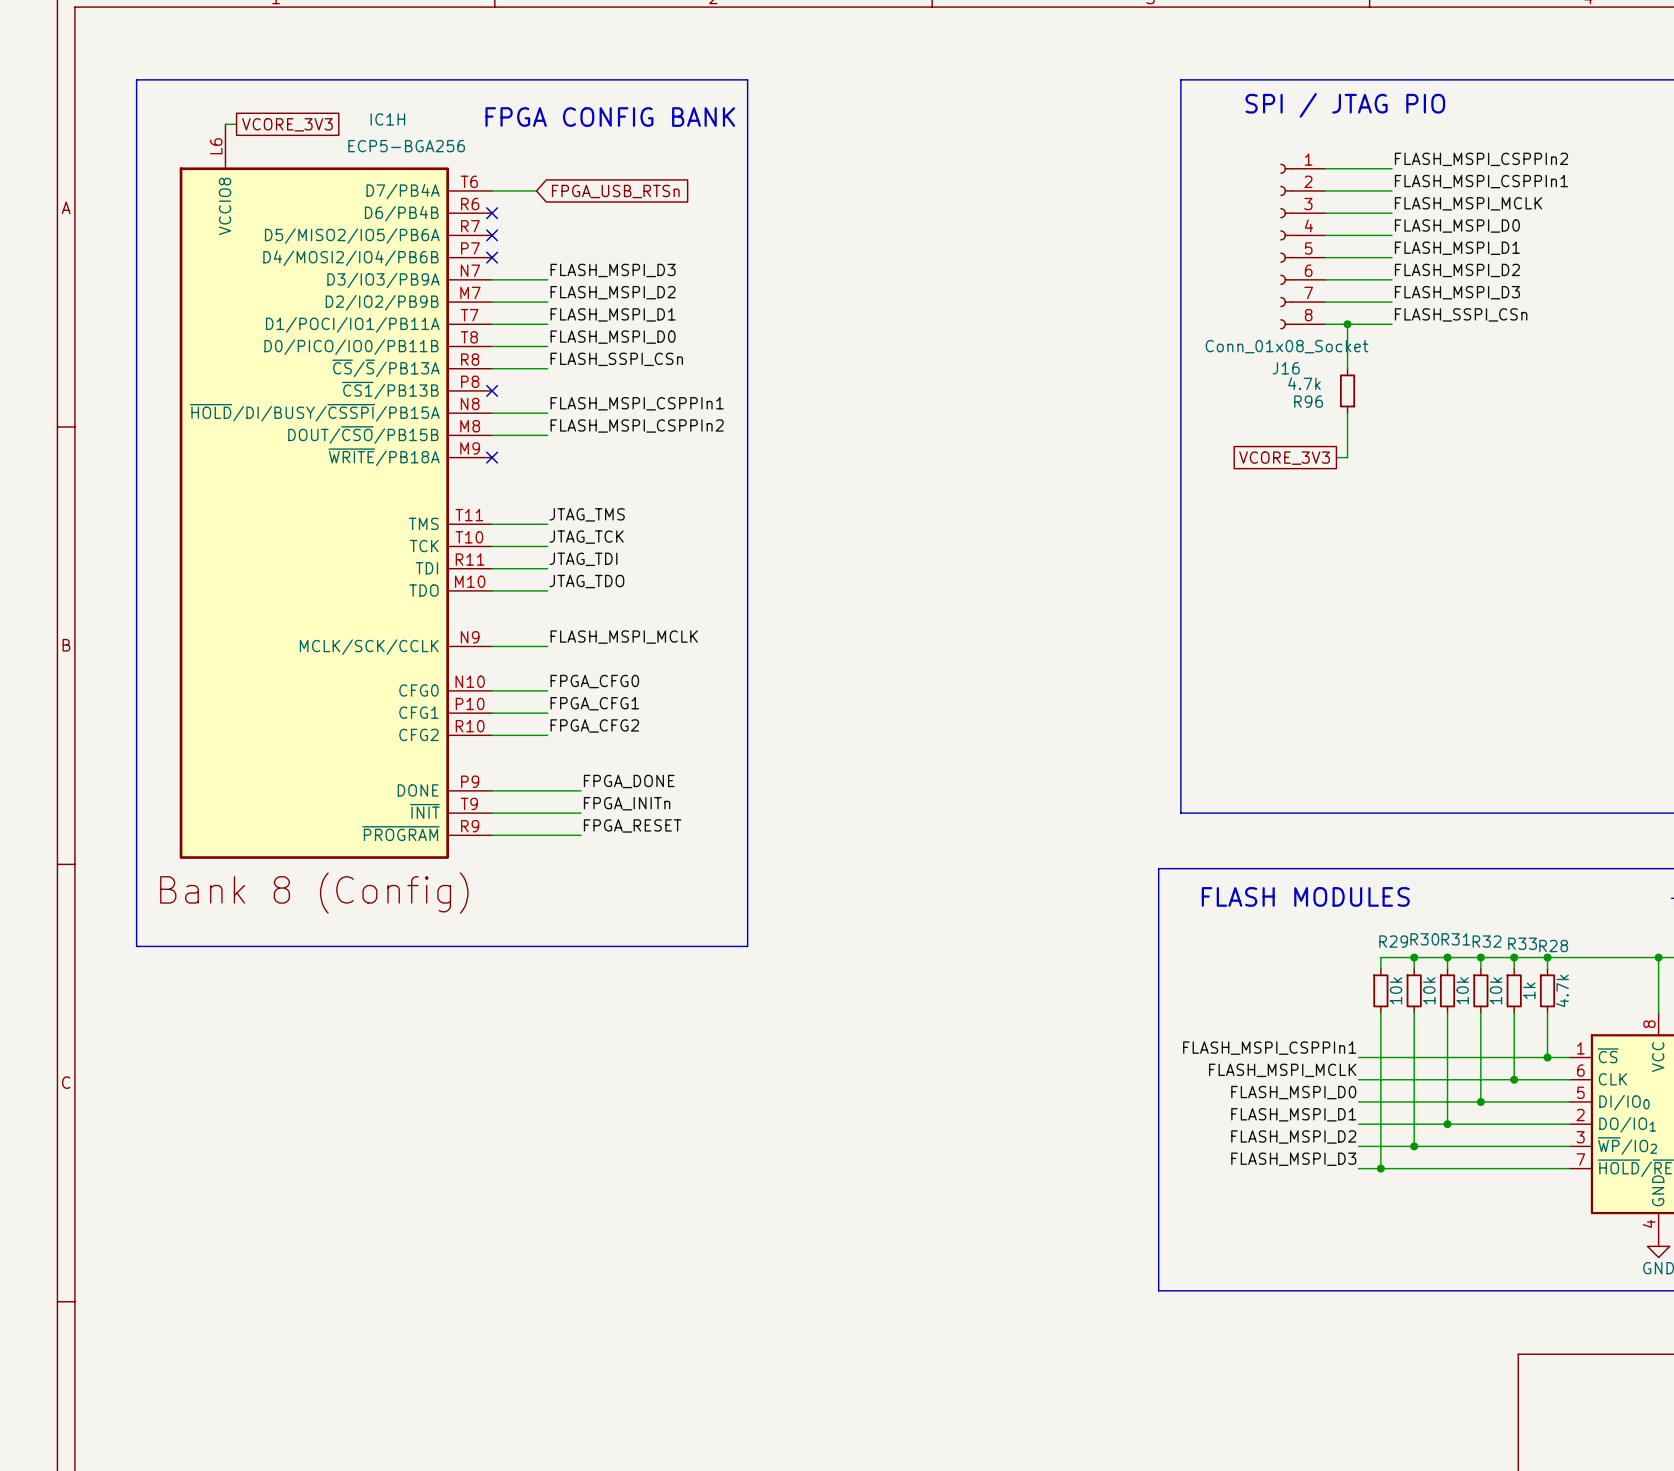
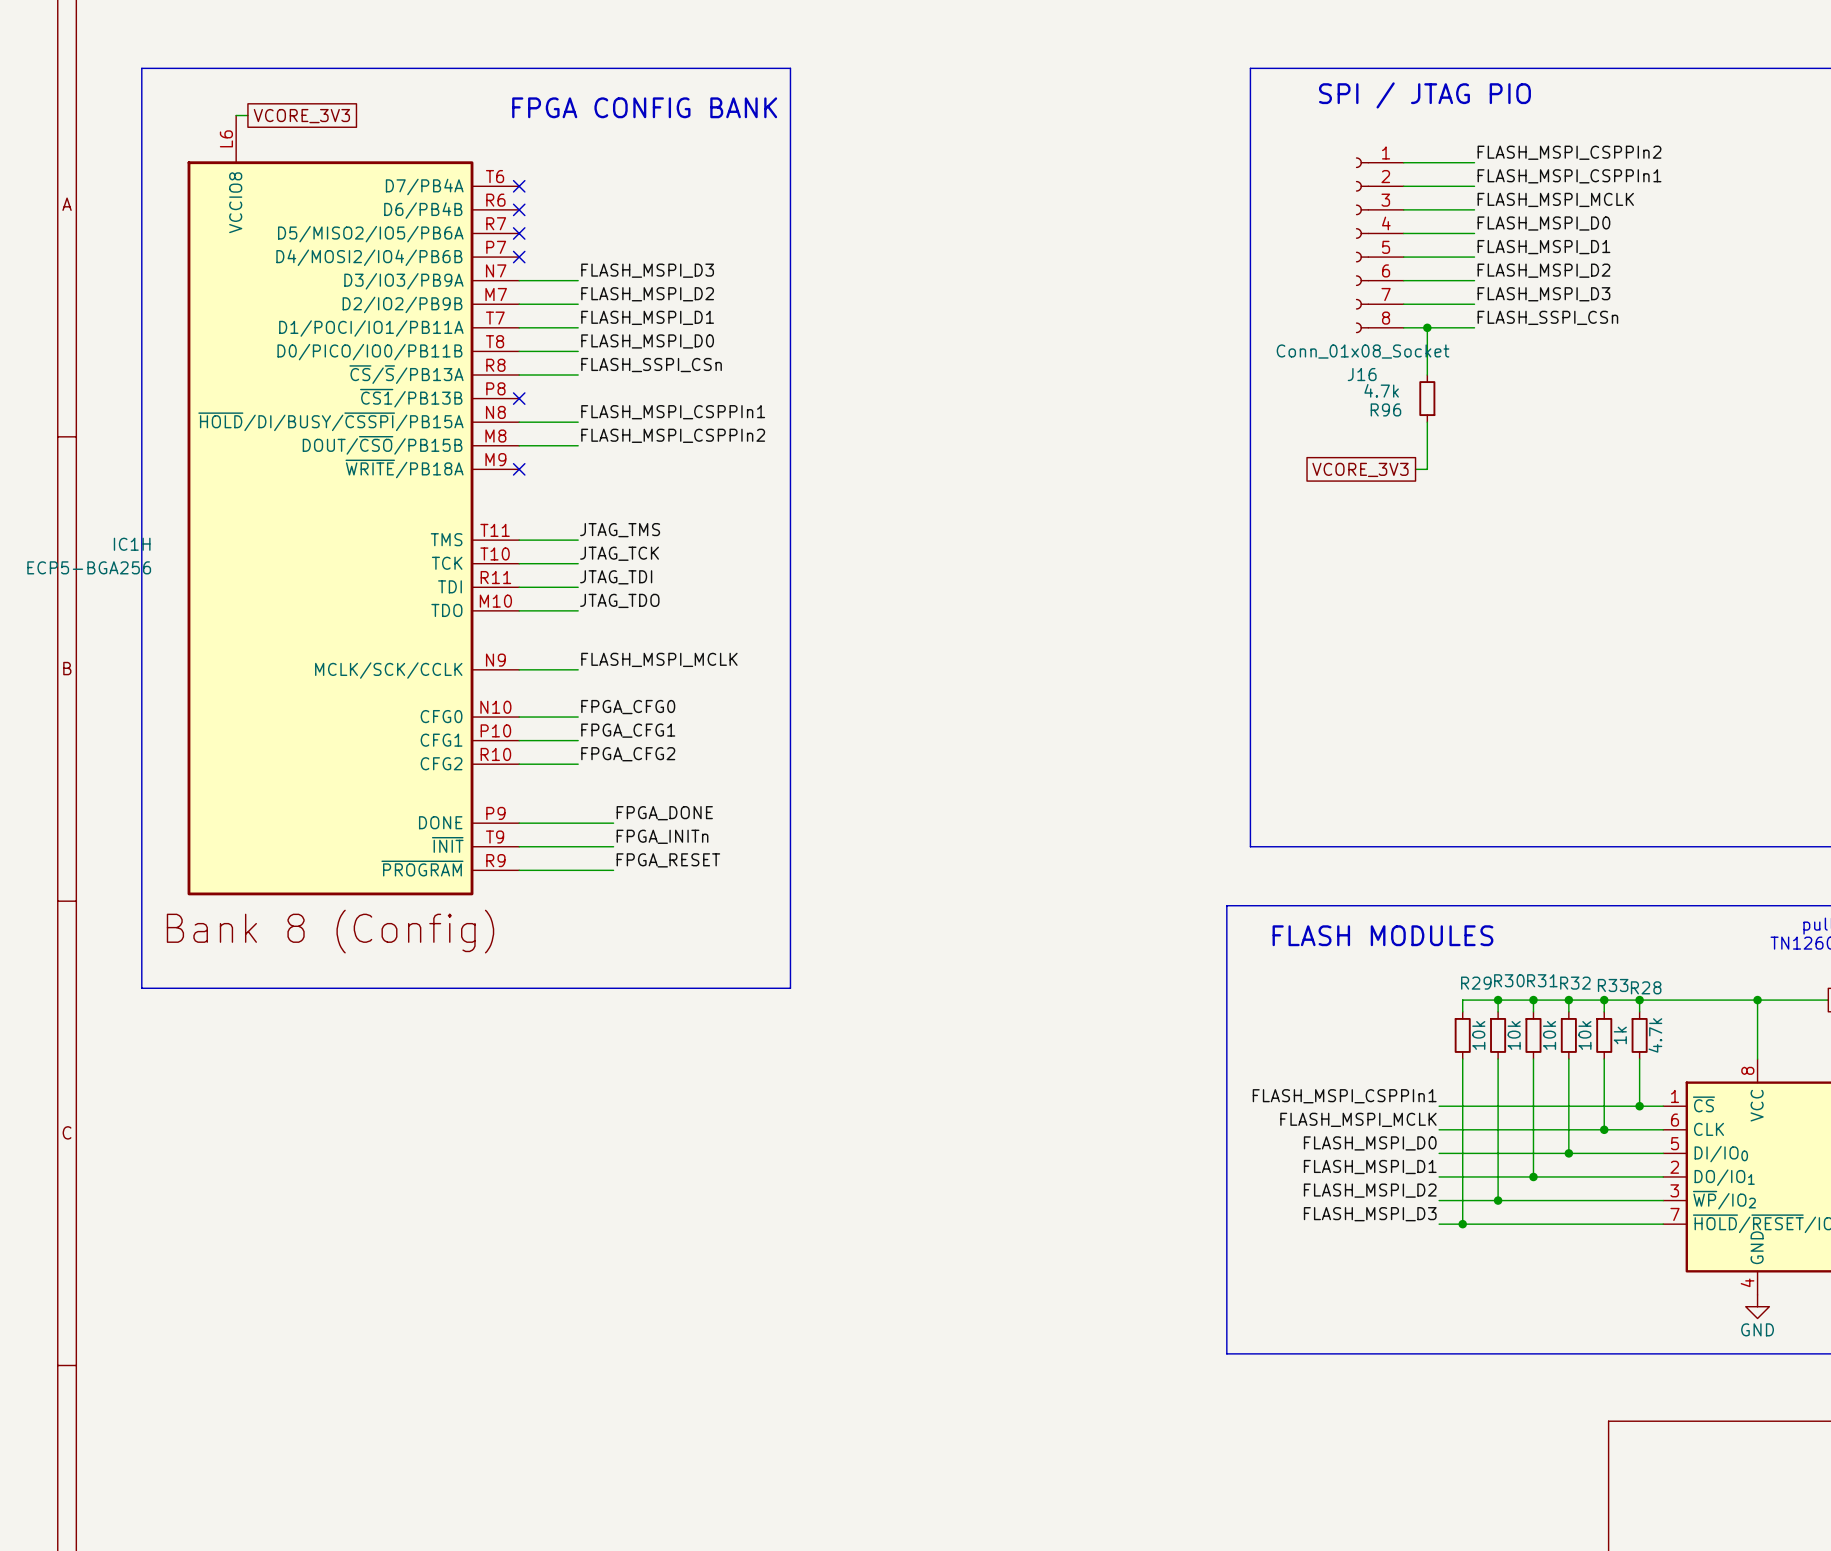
IC1H name position: IC1H (387, 119) -> IC1H (132, 544)
IC1H value position: ECP5-BGA256 (406, 146) -> ECP5-BGA256 (89, 567)
wire: (492, 190) (536, 190) -> none
no-connect mark: none -> (519, 186)
global label: FPGA_USB_RTSn (615, 191) -> none

